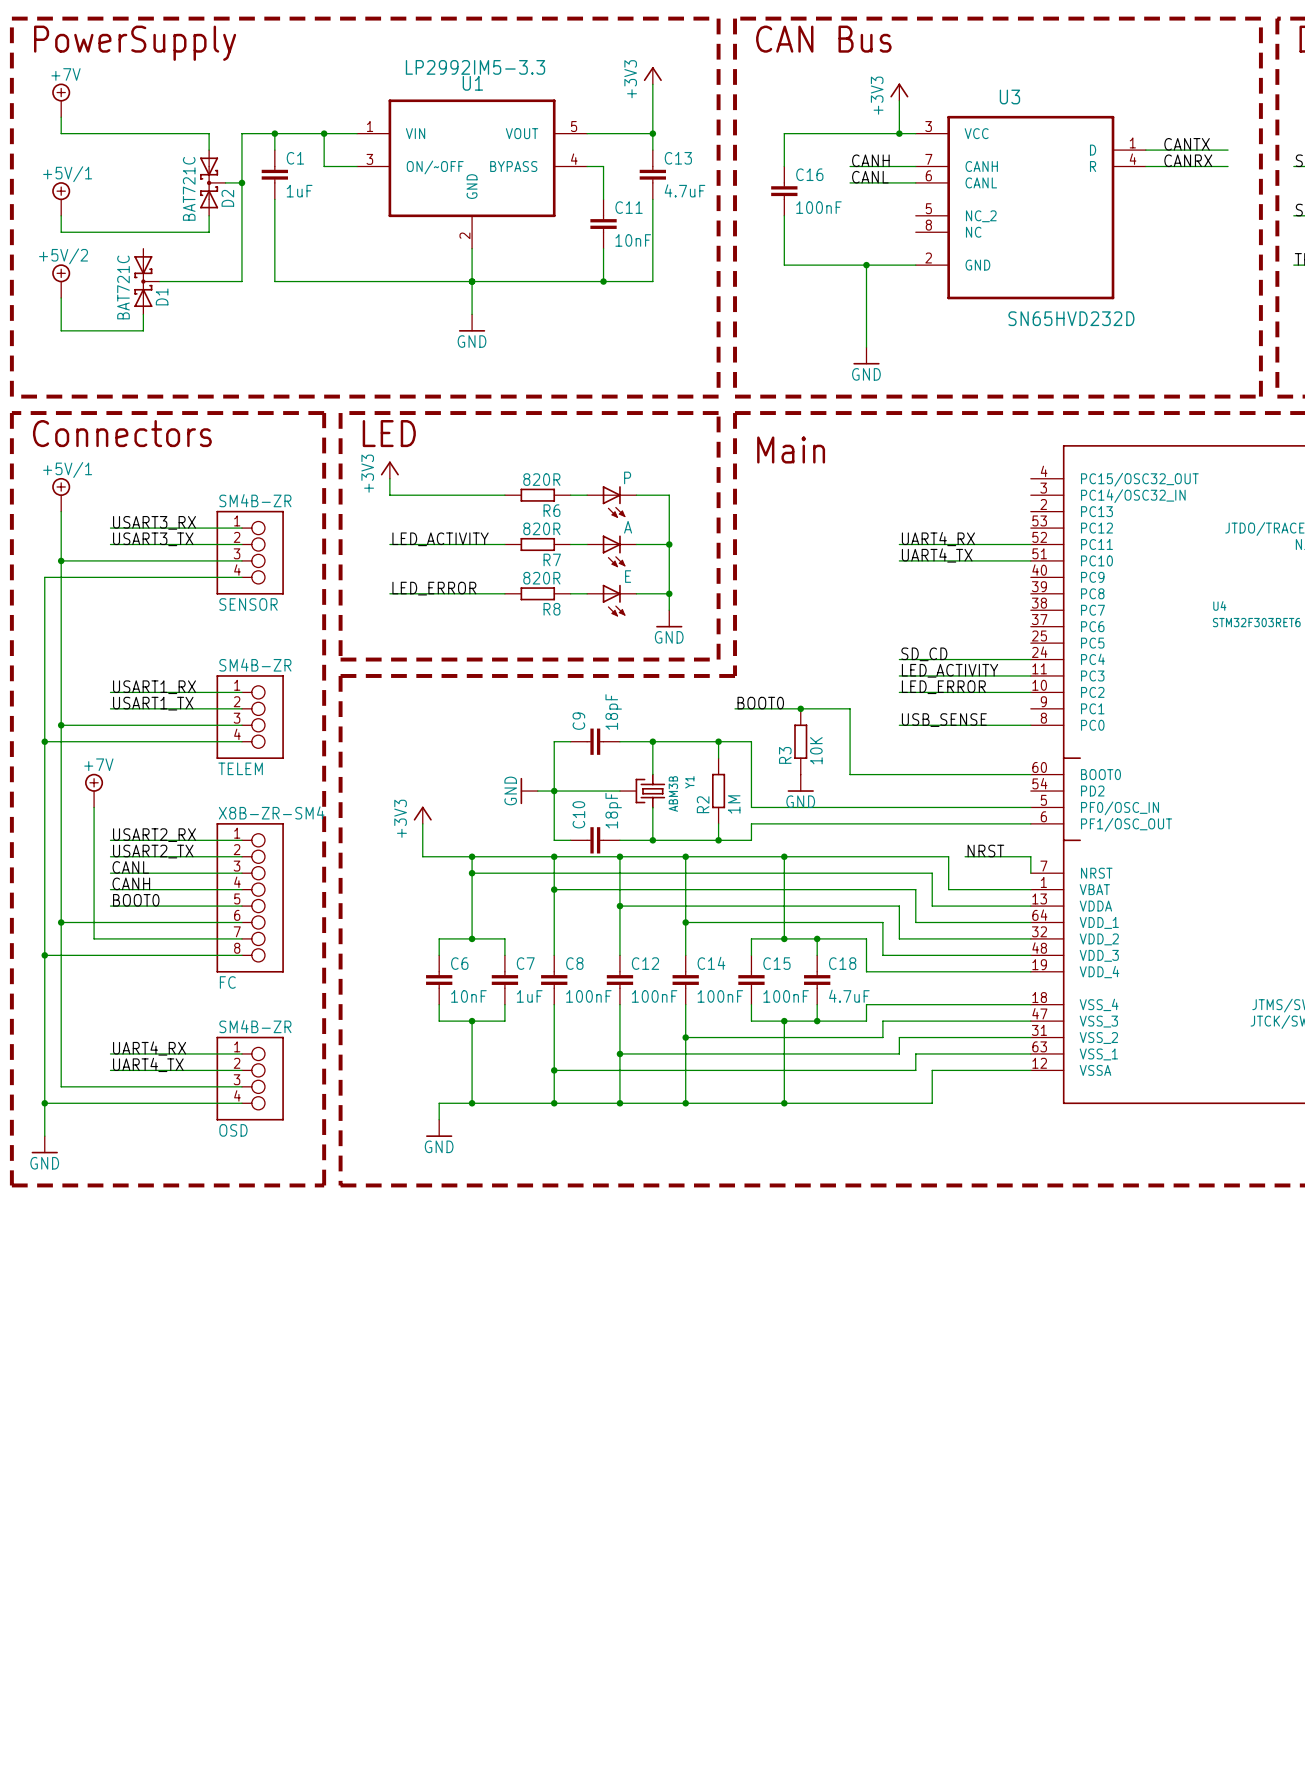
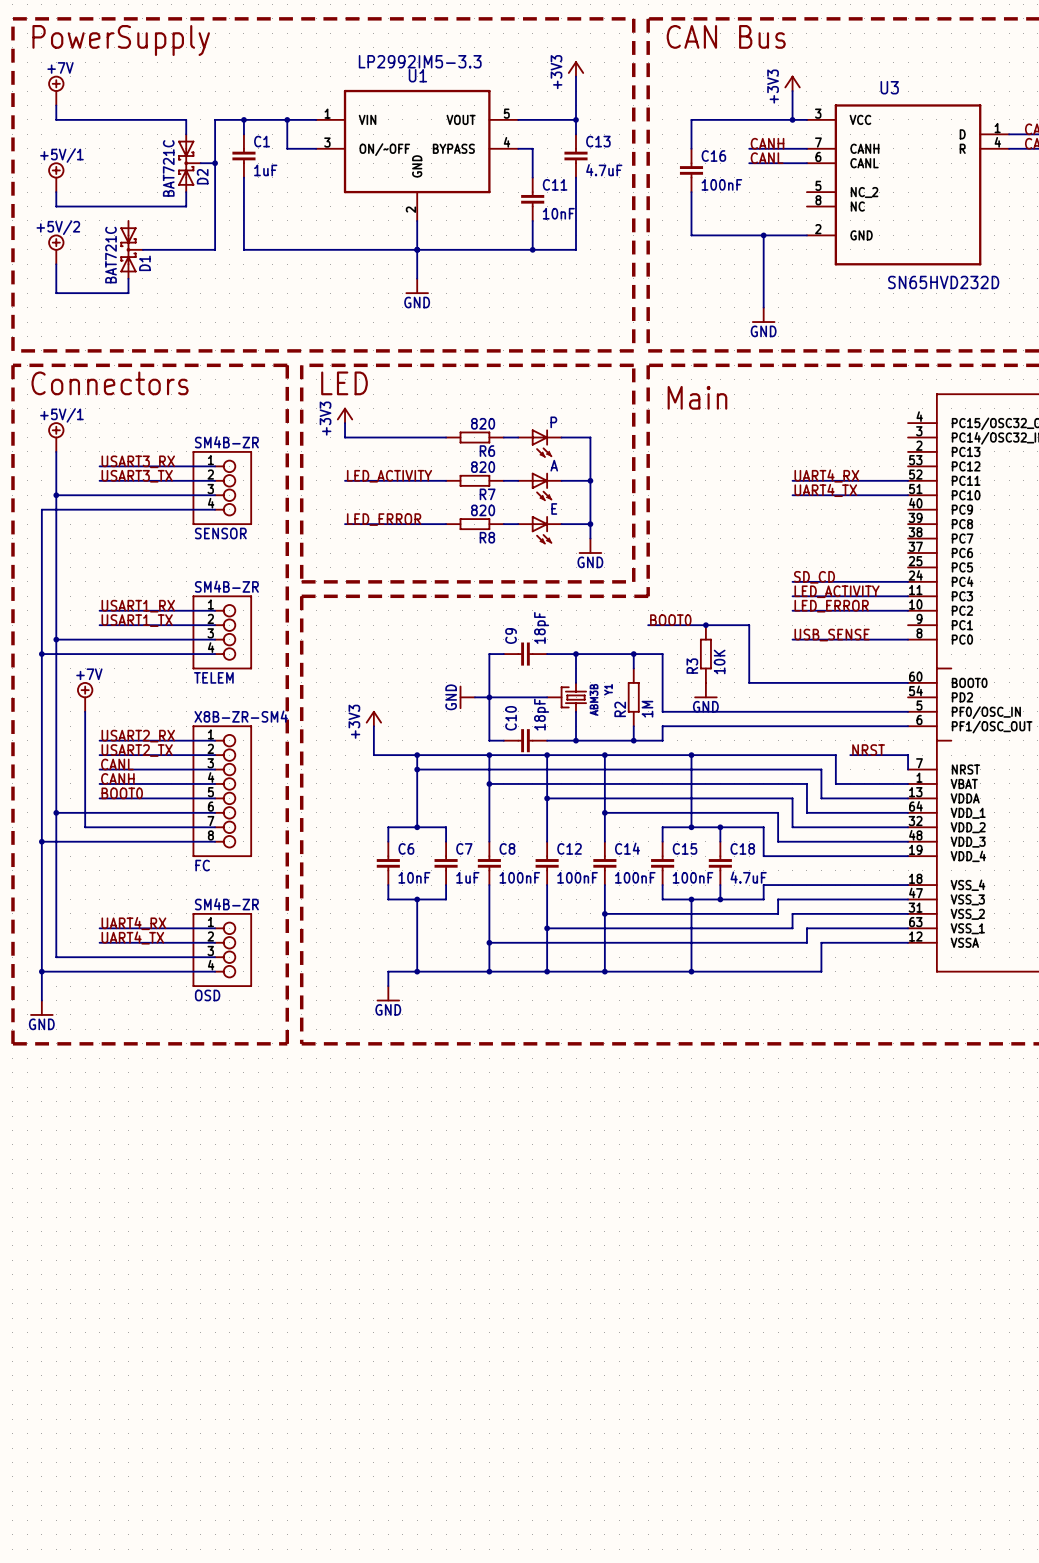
R6 value: 820R (541, 479) -> 820 (483, 423)
R7 value: 820R (541, 528) -> 820 (483, 467)
R8 value: 820R (541, 578) -> 820 (483, 510)

